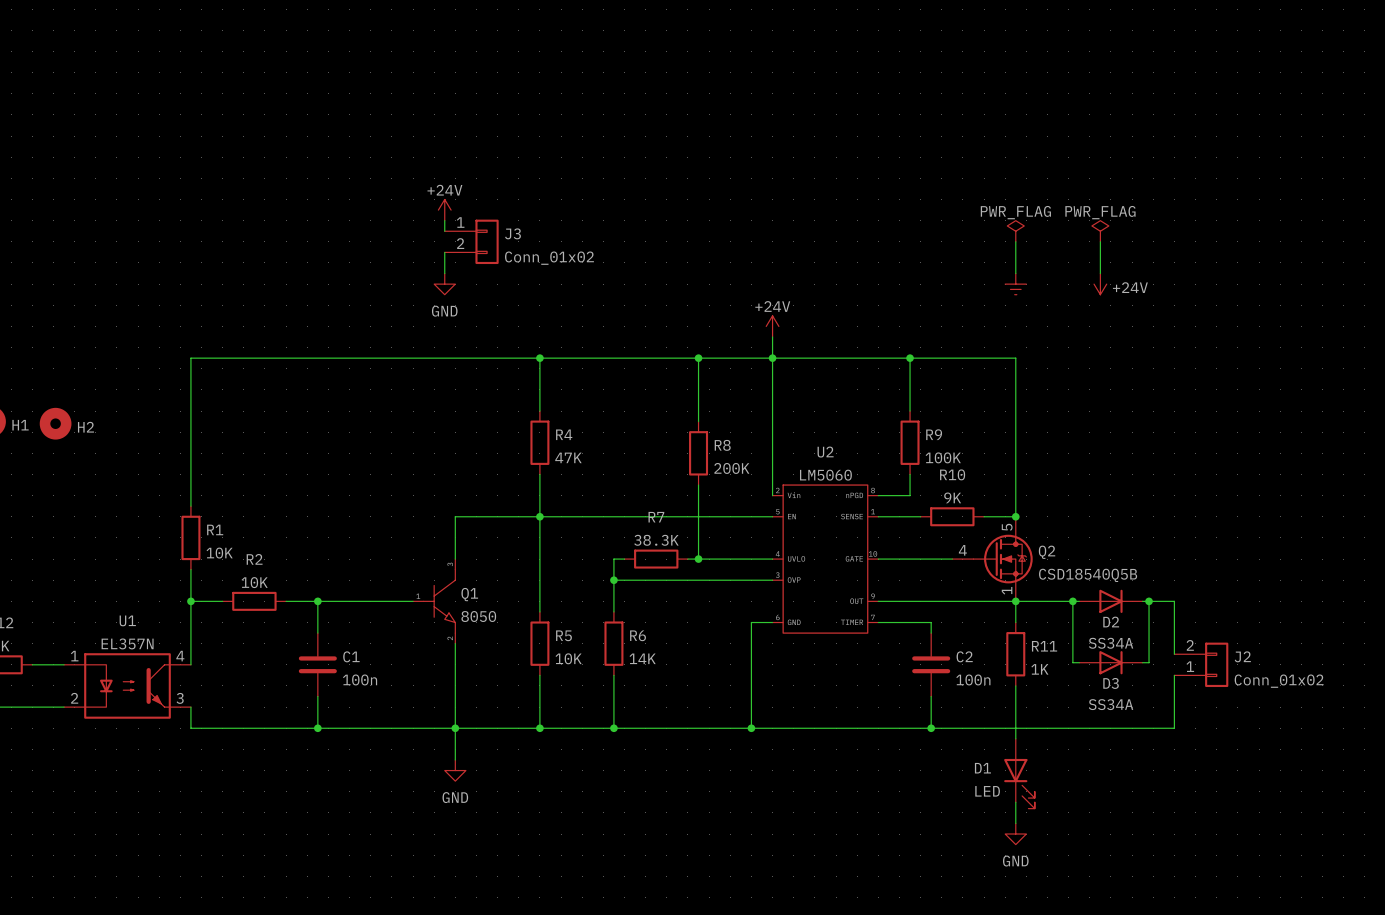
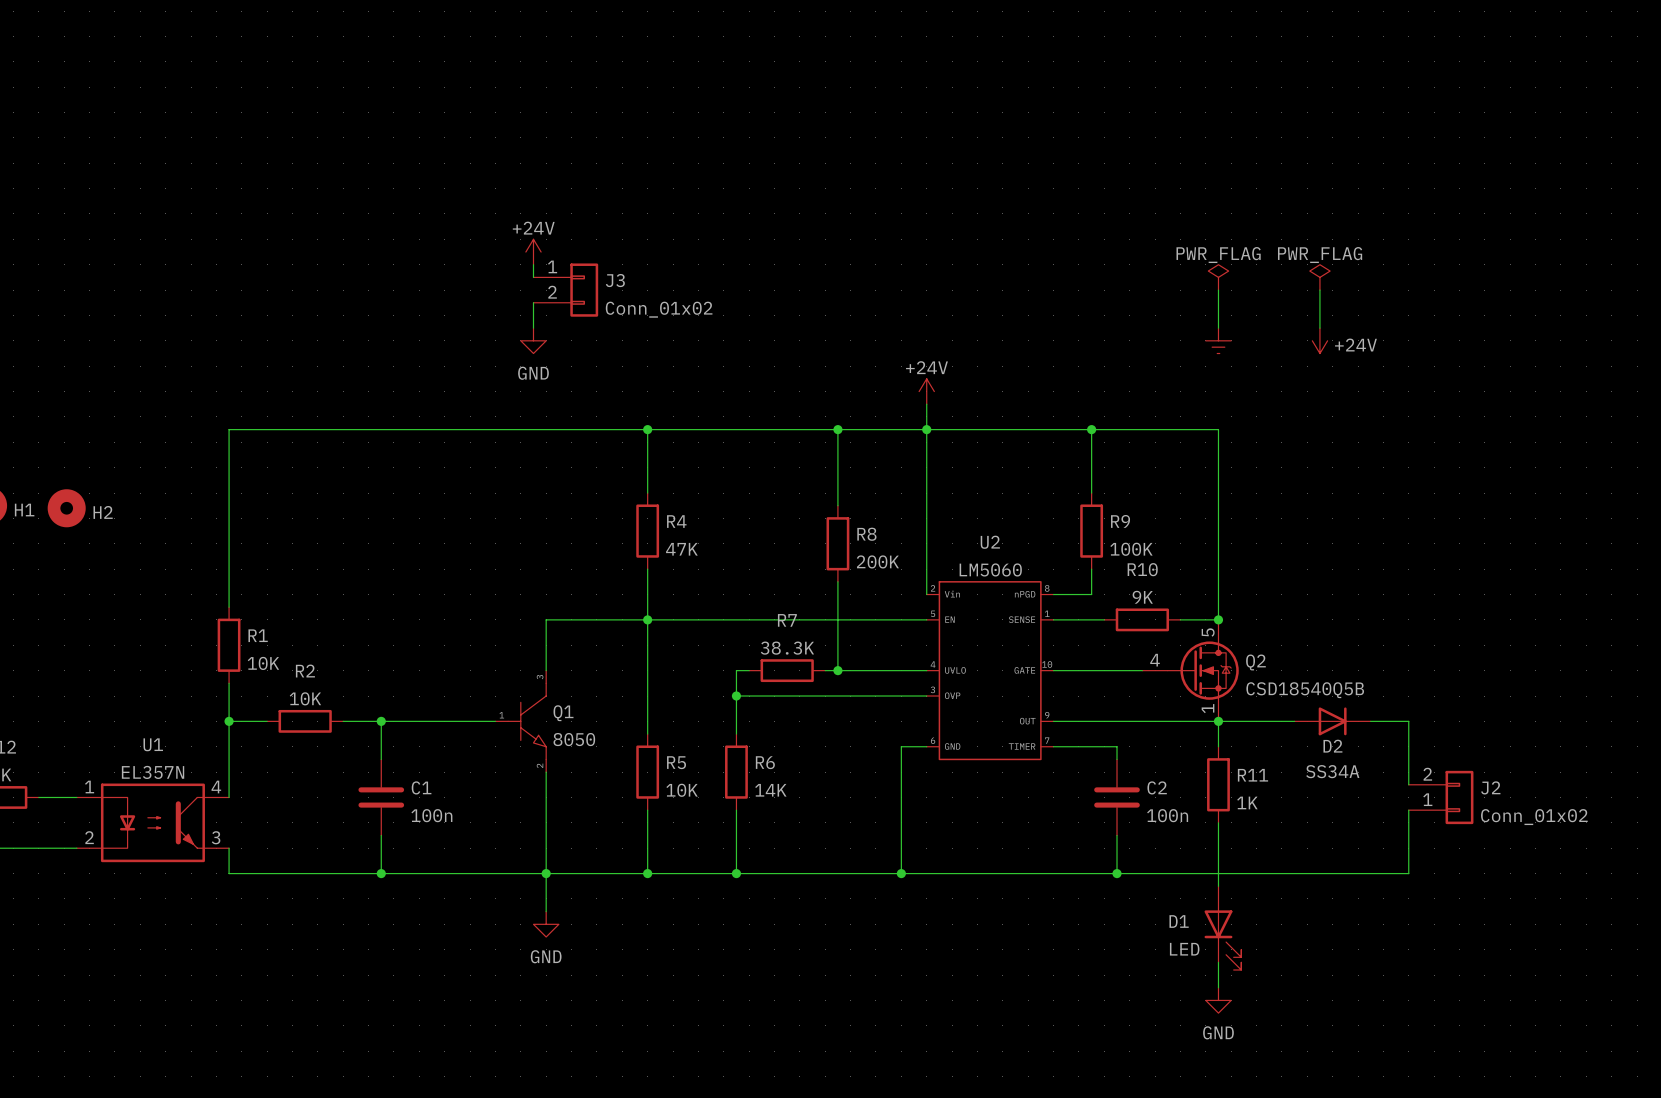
wire: (1072, 601) (1072, 662) (1079, 662) -> none
junction: (1072, 601) -> none
wire: (1149, 601) (1149, 662) (1142, 662) -> none
junction: (1149, 601) -> none
D3: SS34A (1110, 662) -> none

